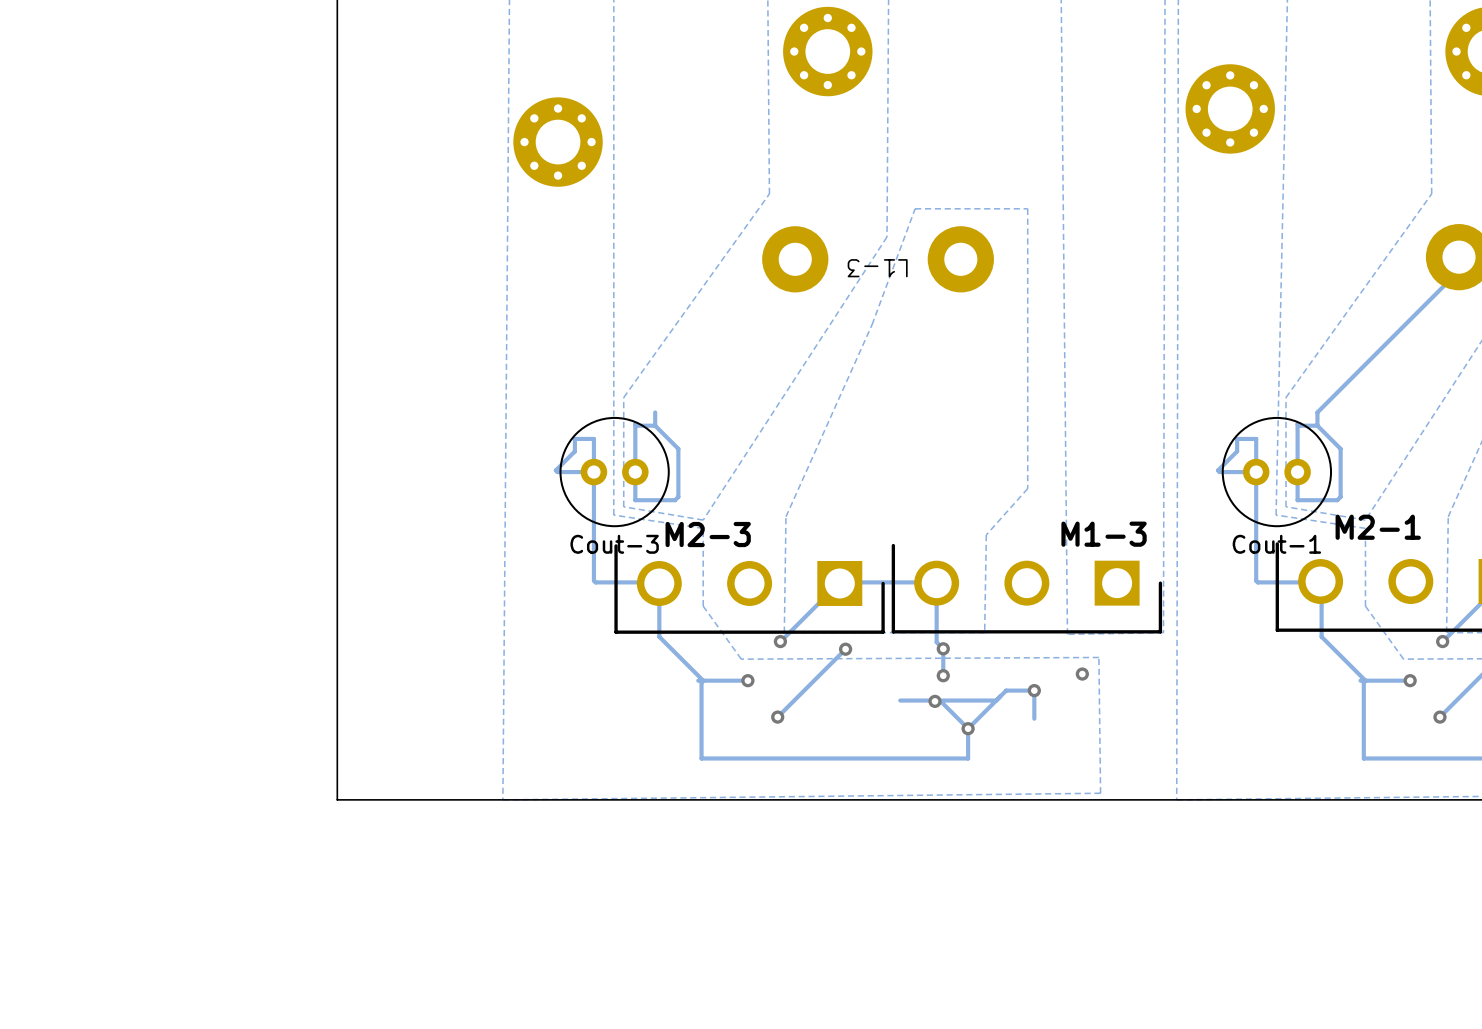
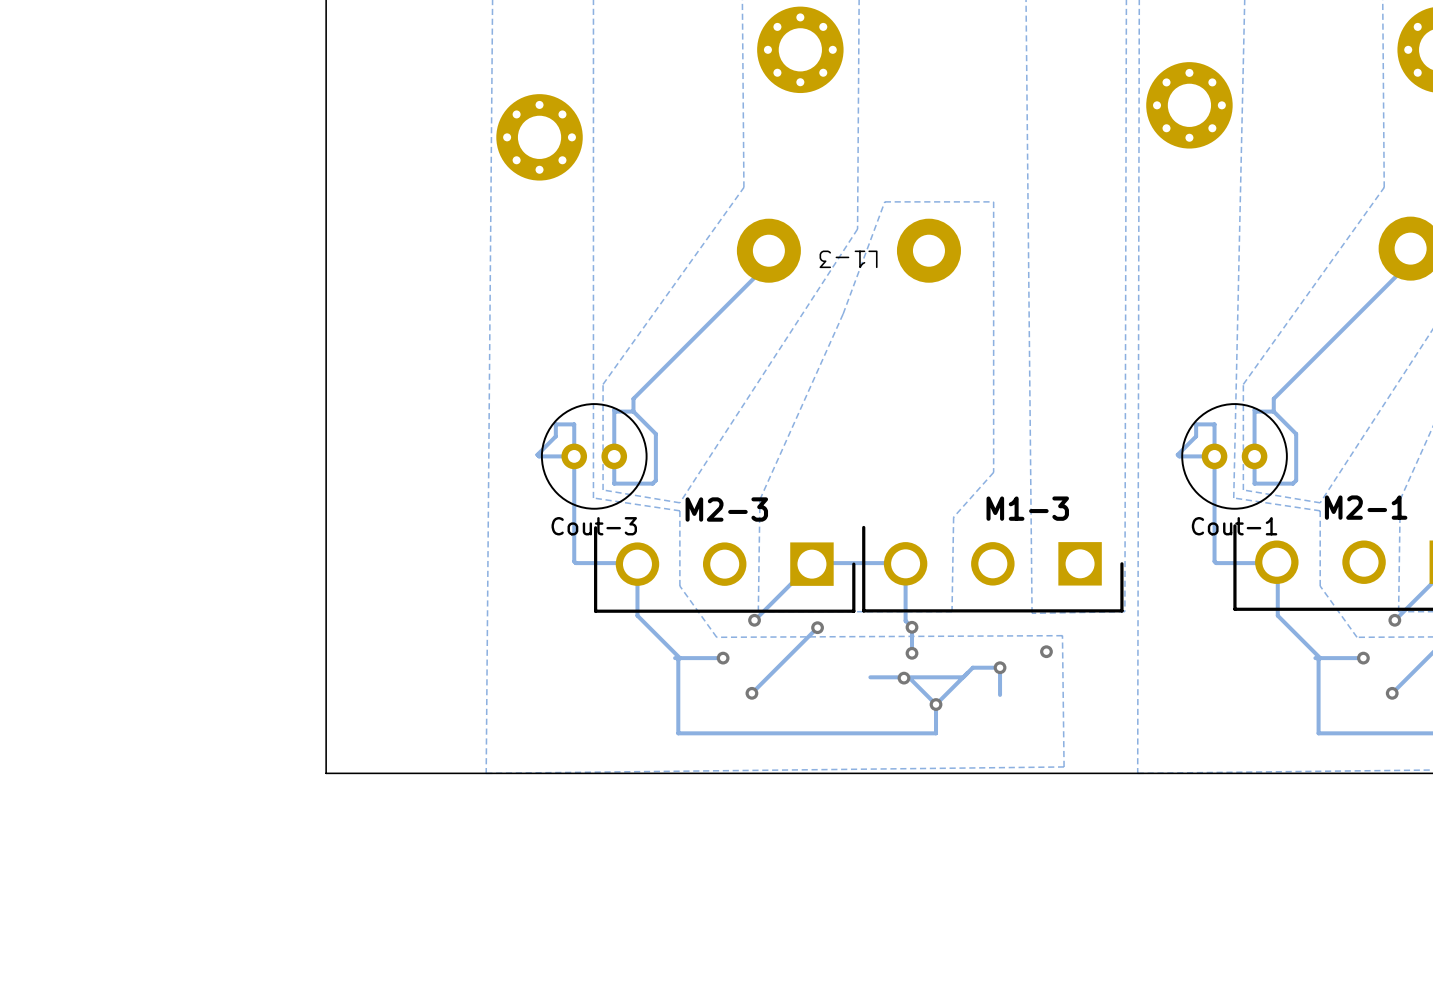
track: none -> (782, 249) (633, 398)
M2-1 name position: M2-1 (1378, 527) -> M2-1 (1366, 507)
M2-3 name position: M2-3 (708, 534) -> M2-3 (726, 509)
M1-3 name position: M1-3 (1104, 534) -> M1-3 (1027, 508)

